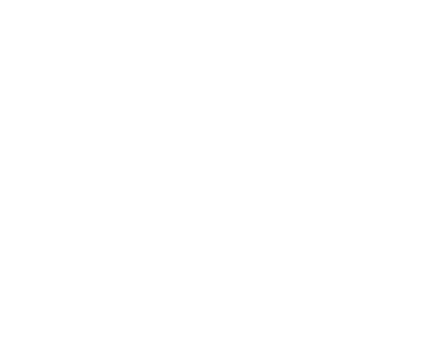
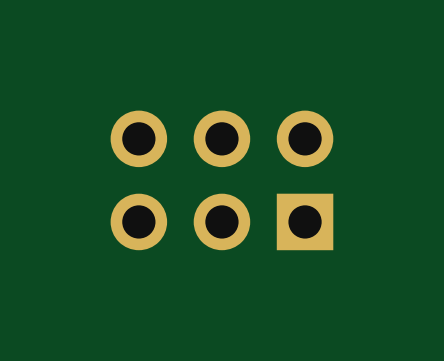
part: none -> (221, 180)

